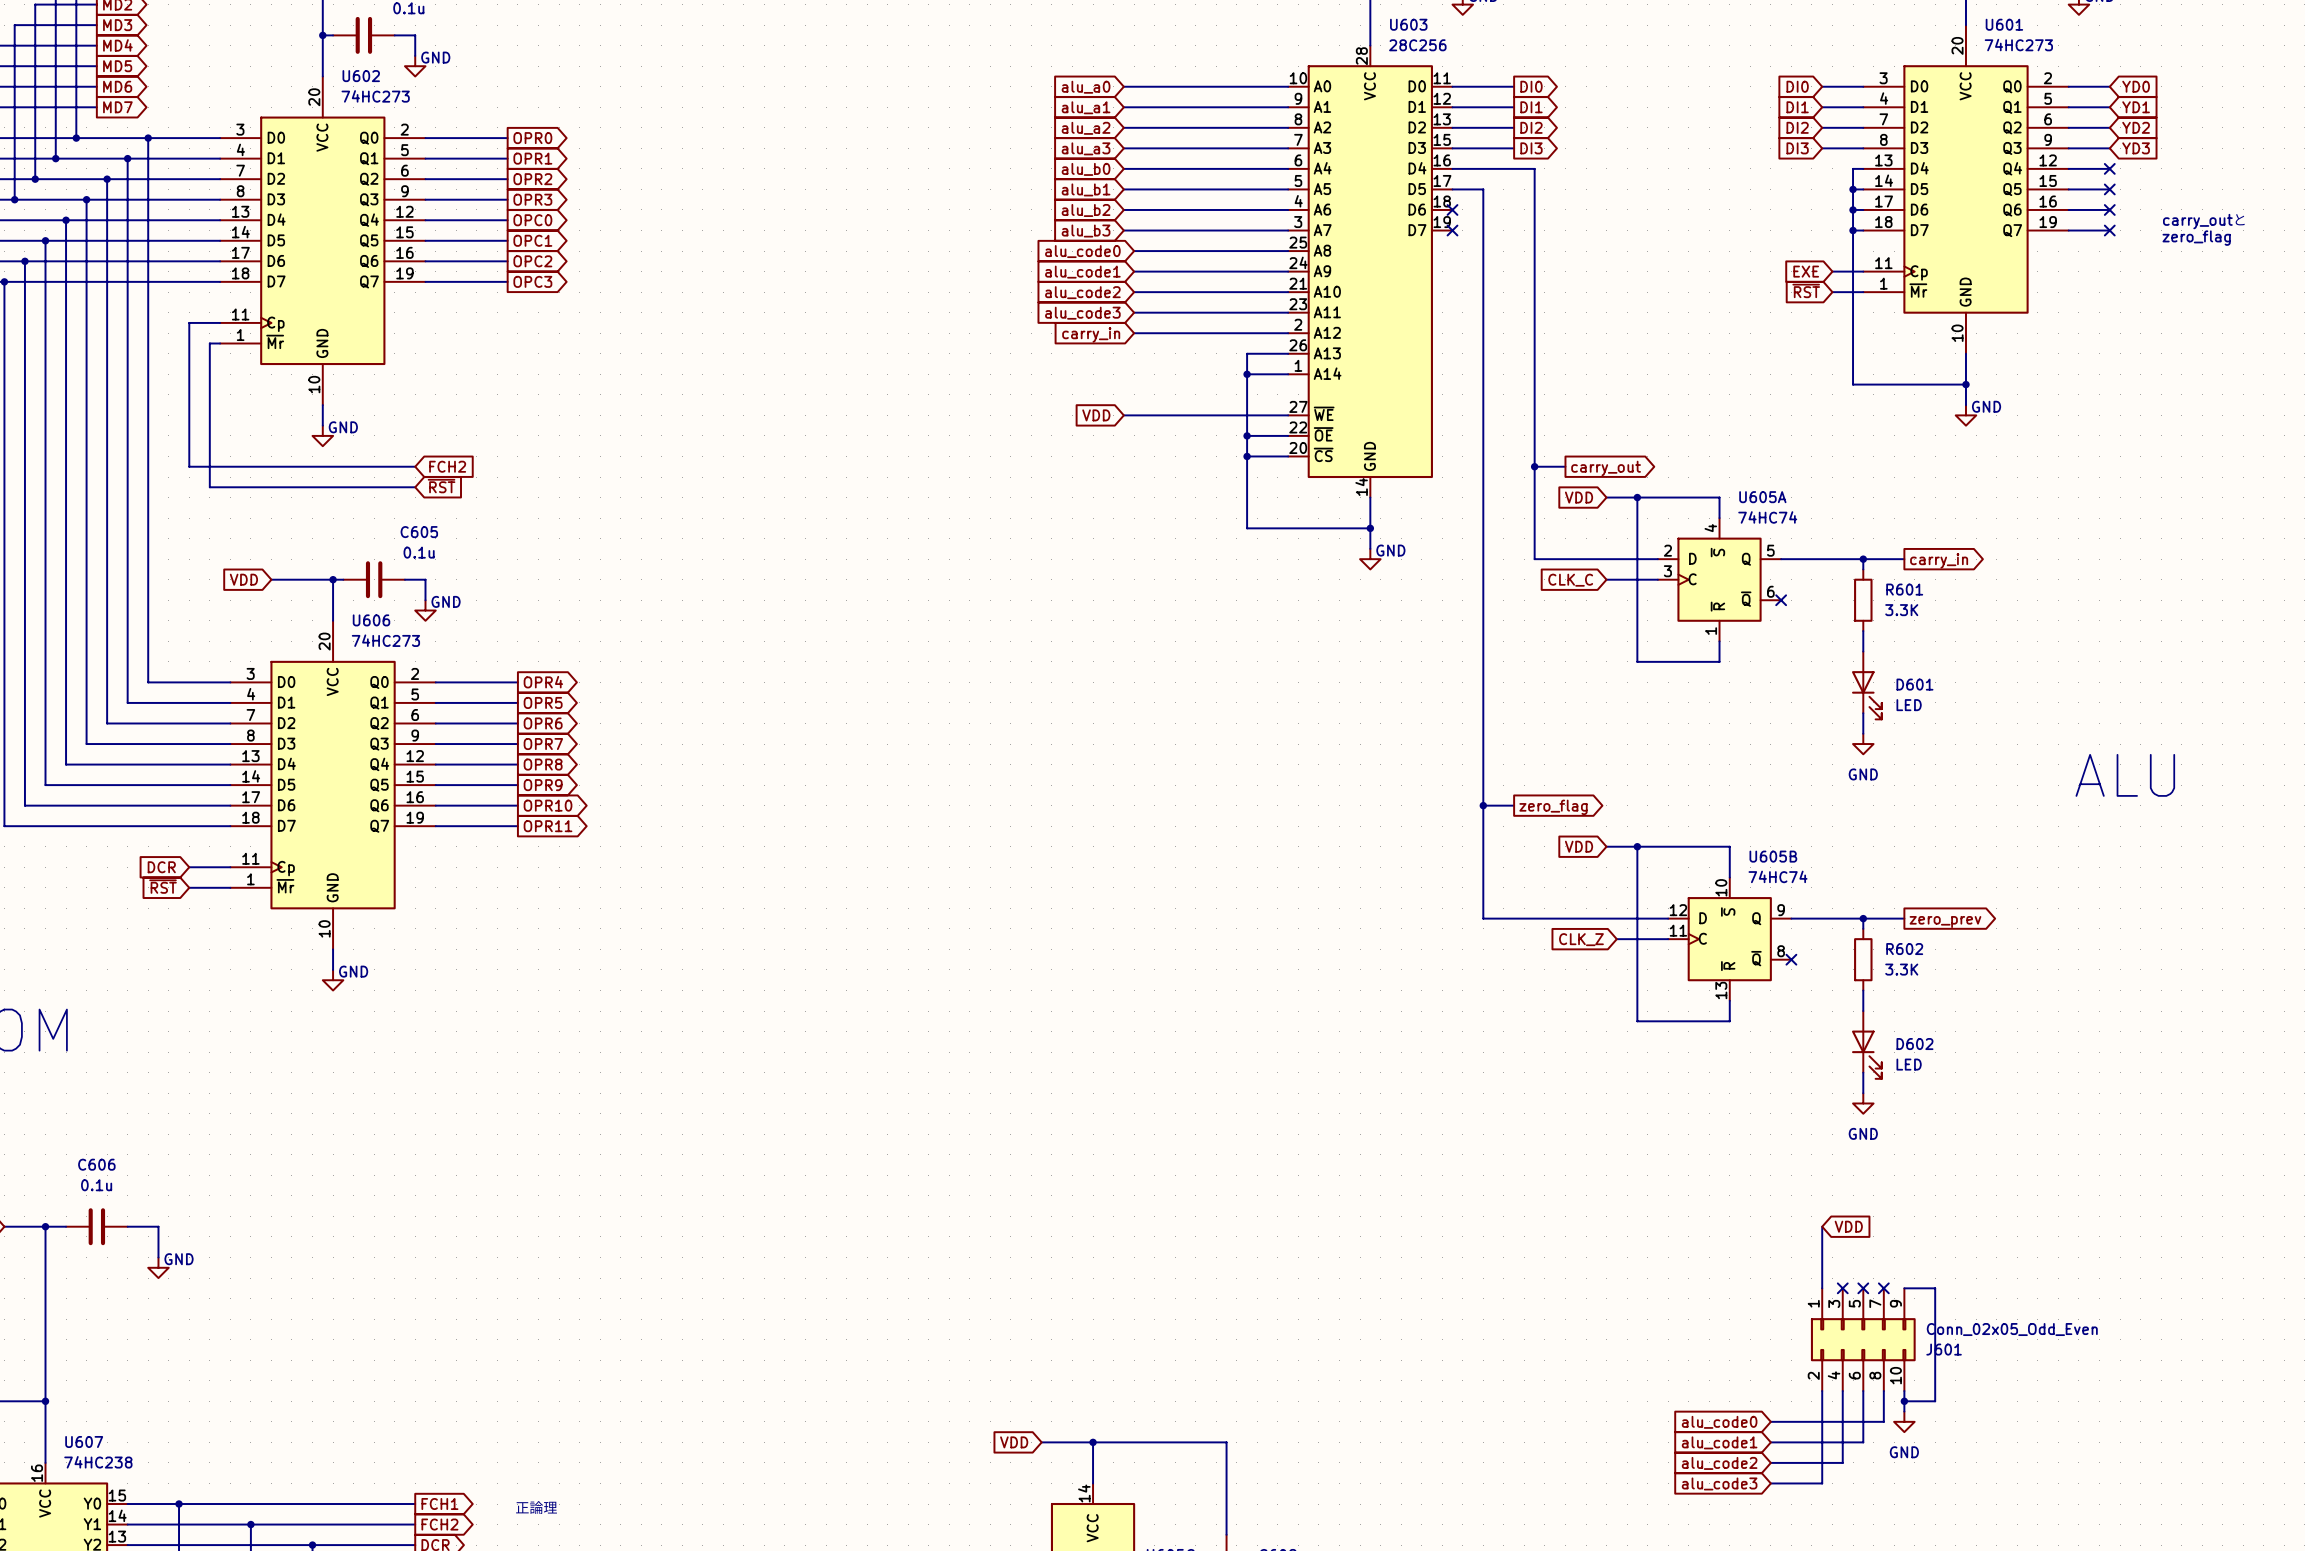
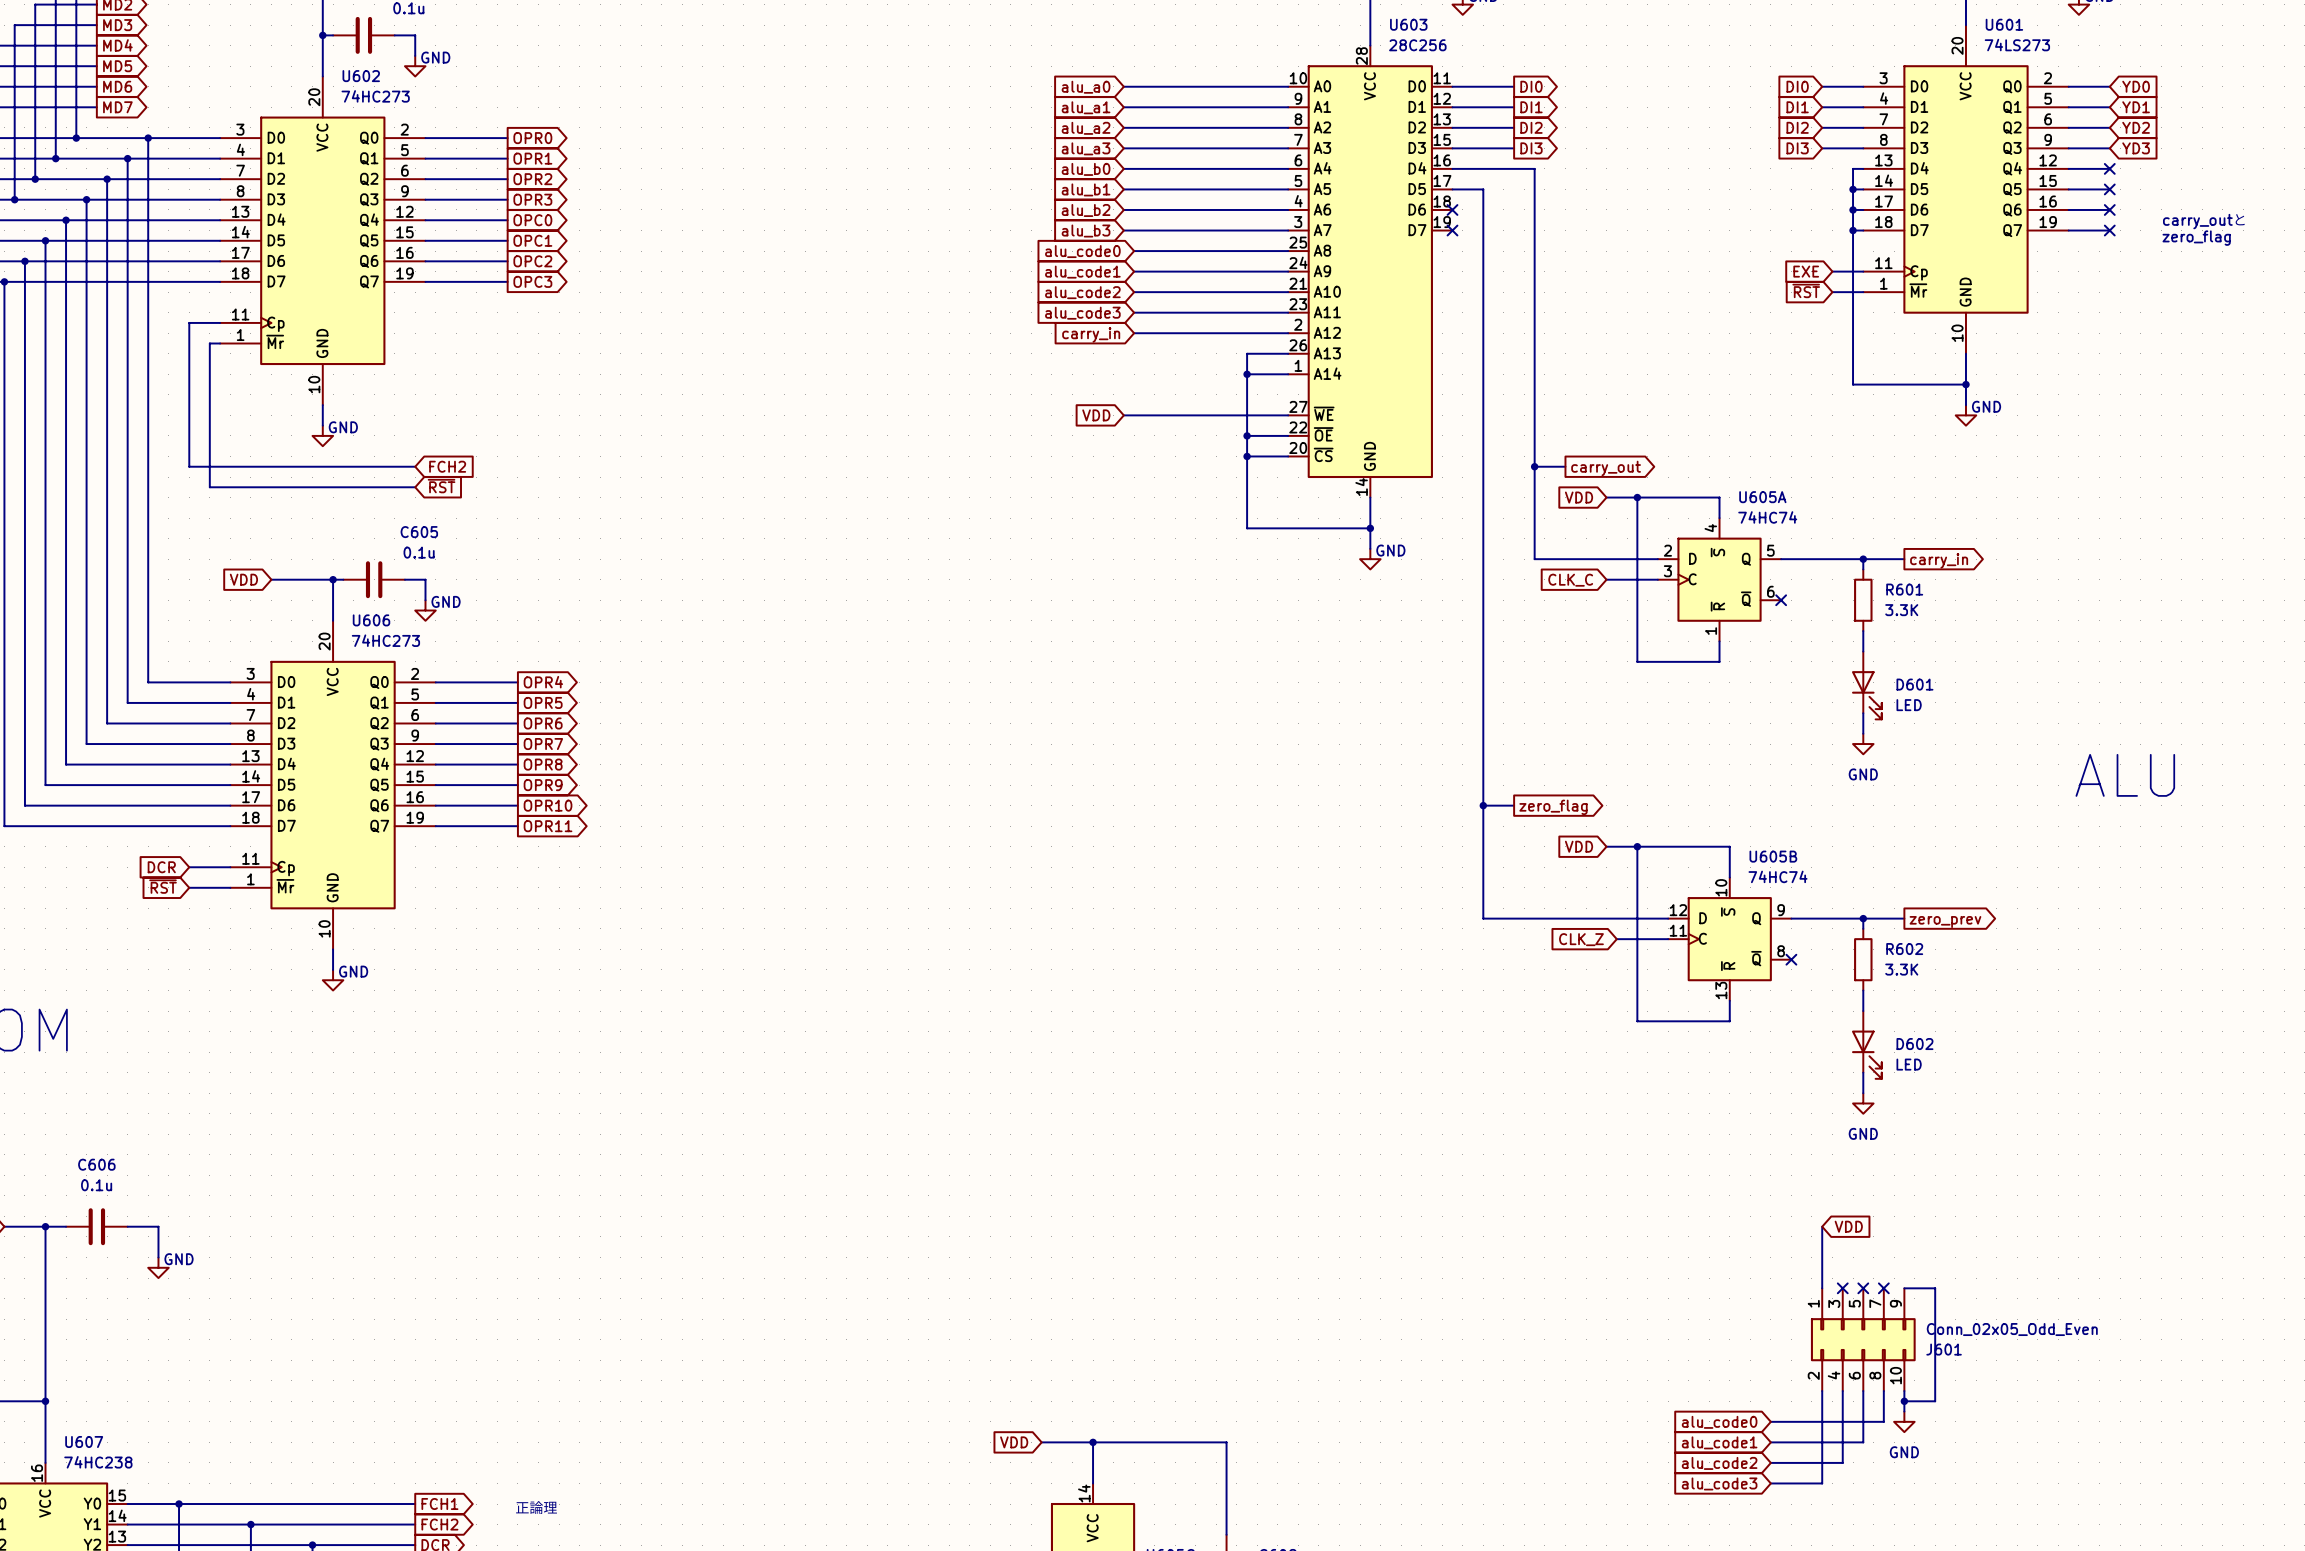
U601 value: 74HC273 (2018, 45) -> 74LS273 (2017, 45)

